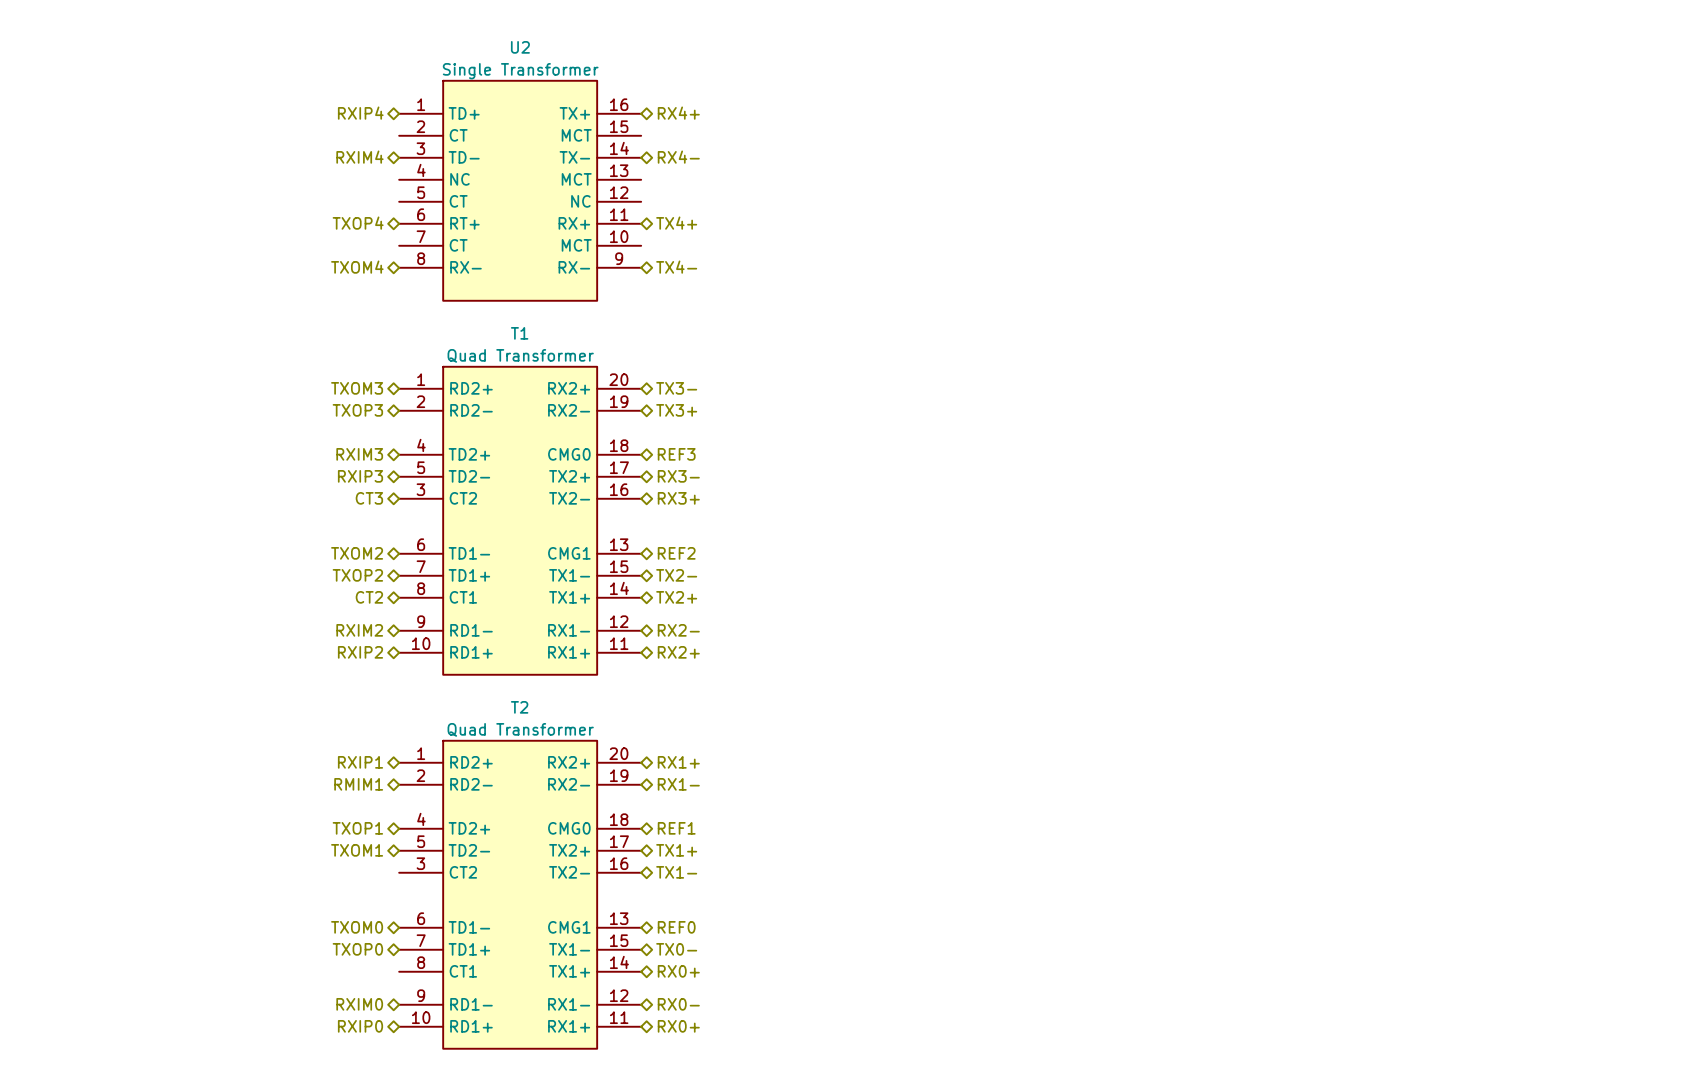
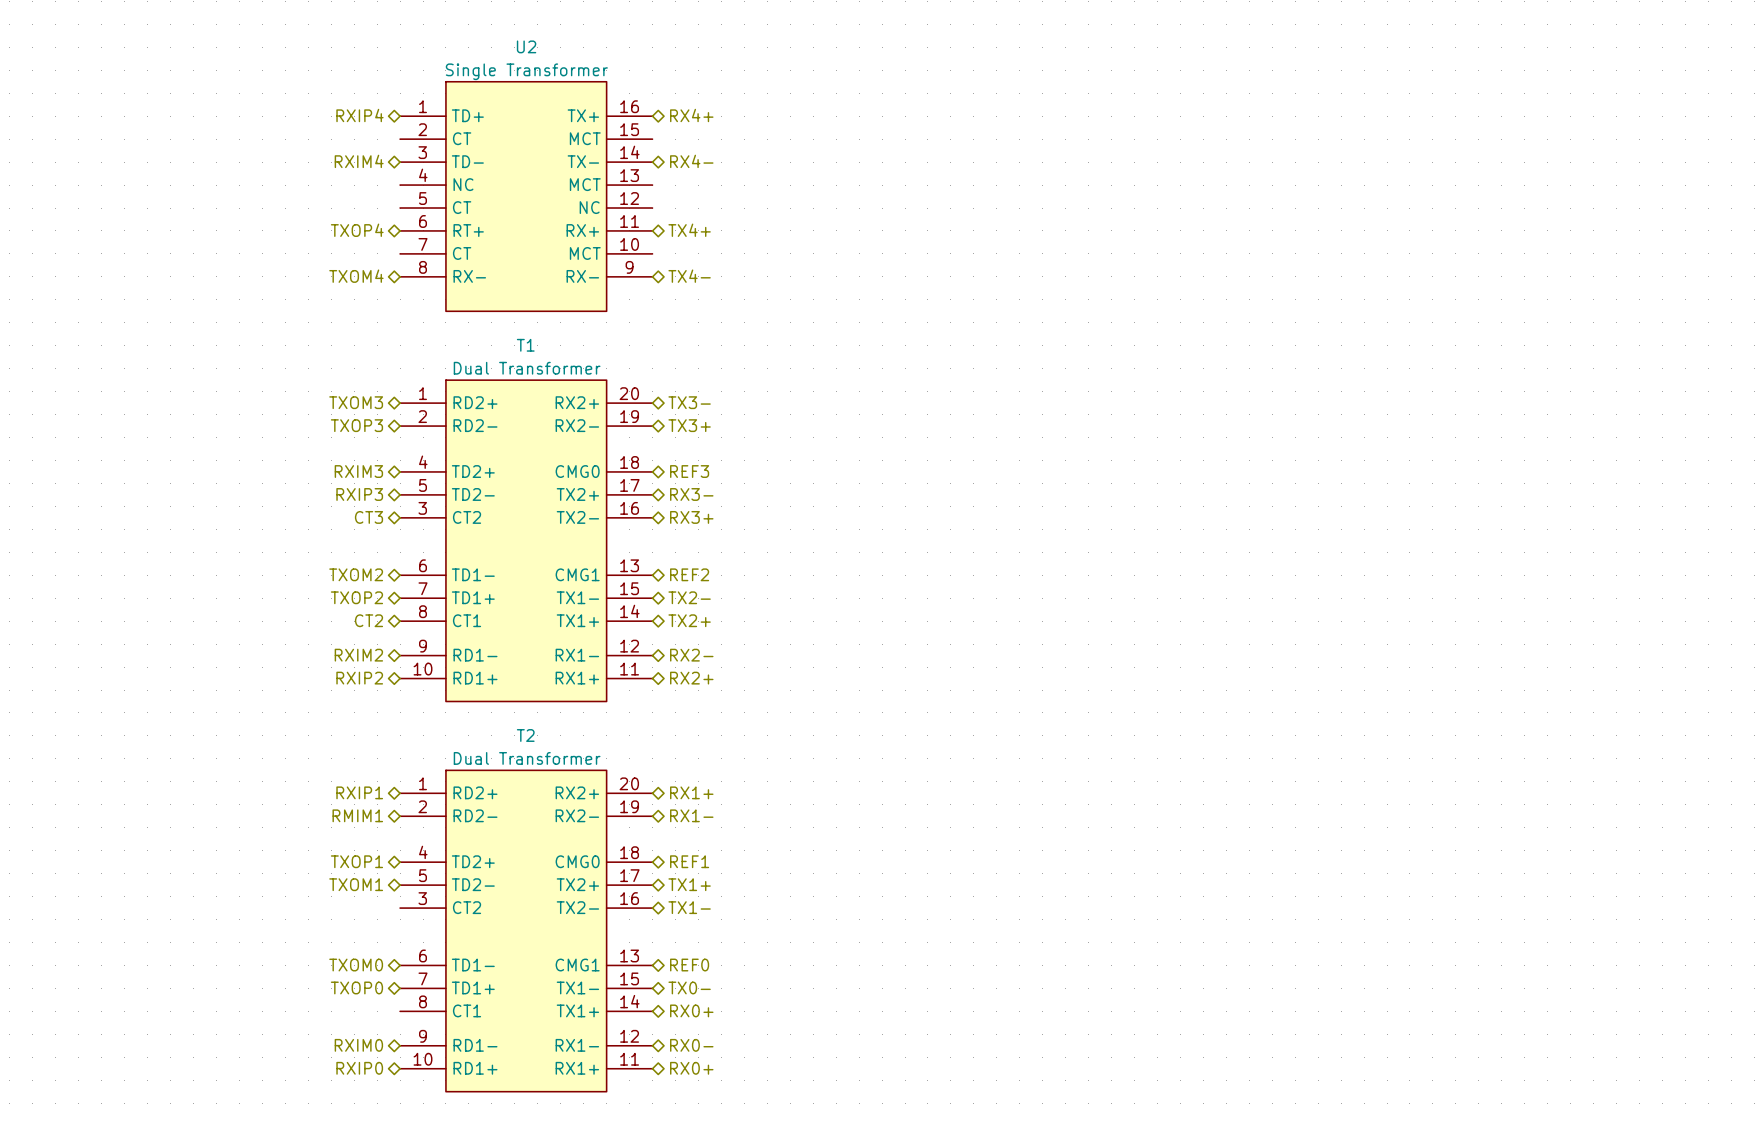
T1 value: Quad Transformer (520, 355) -> Dual Transformer (527, 368)
T2 value: Quad Transformer (520, 729) -> Dual Transformer (527, 758)

